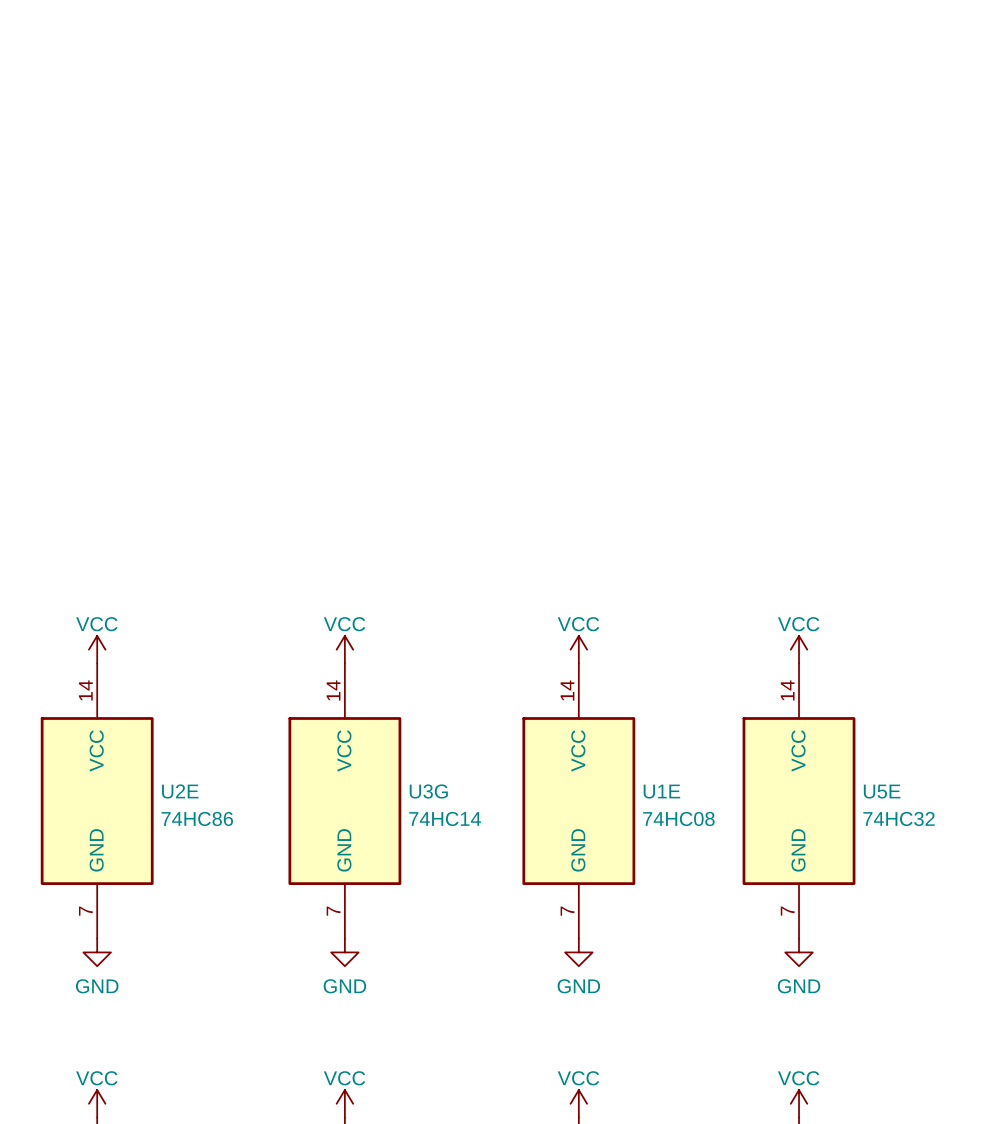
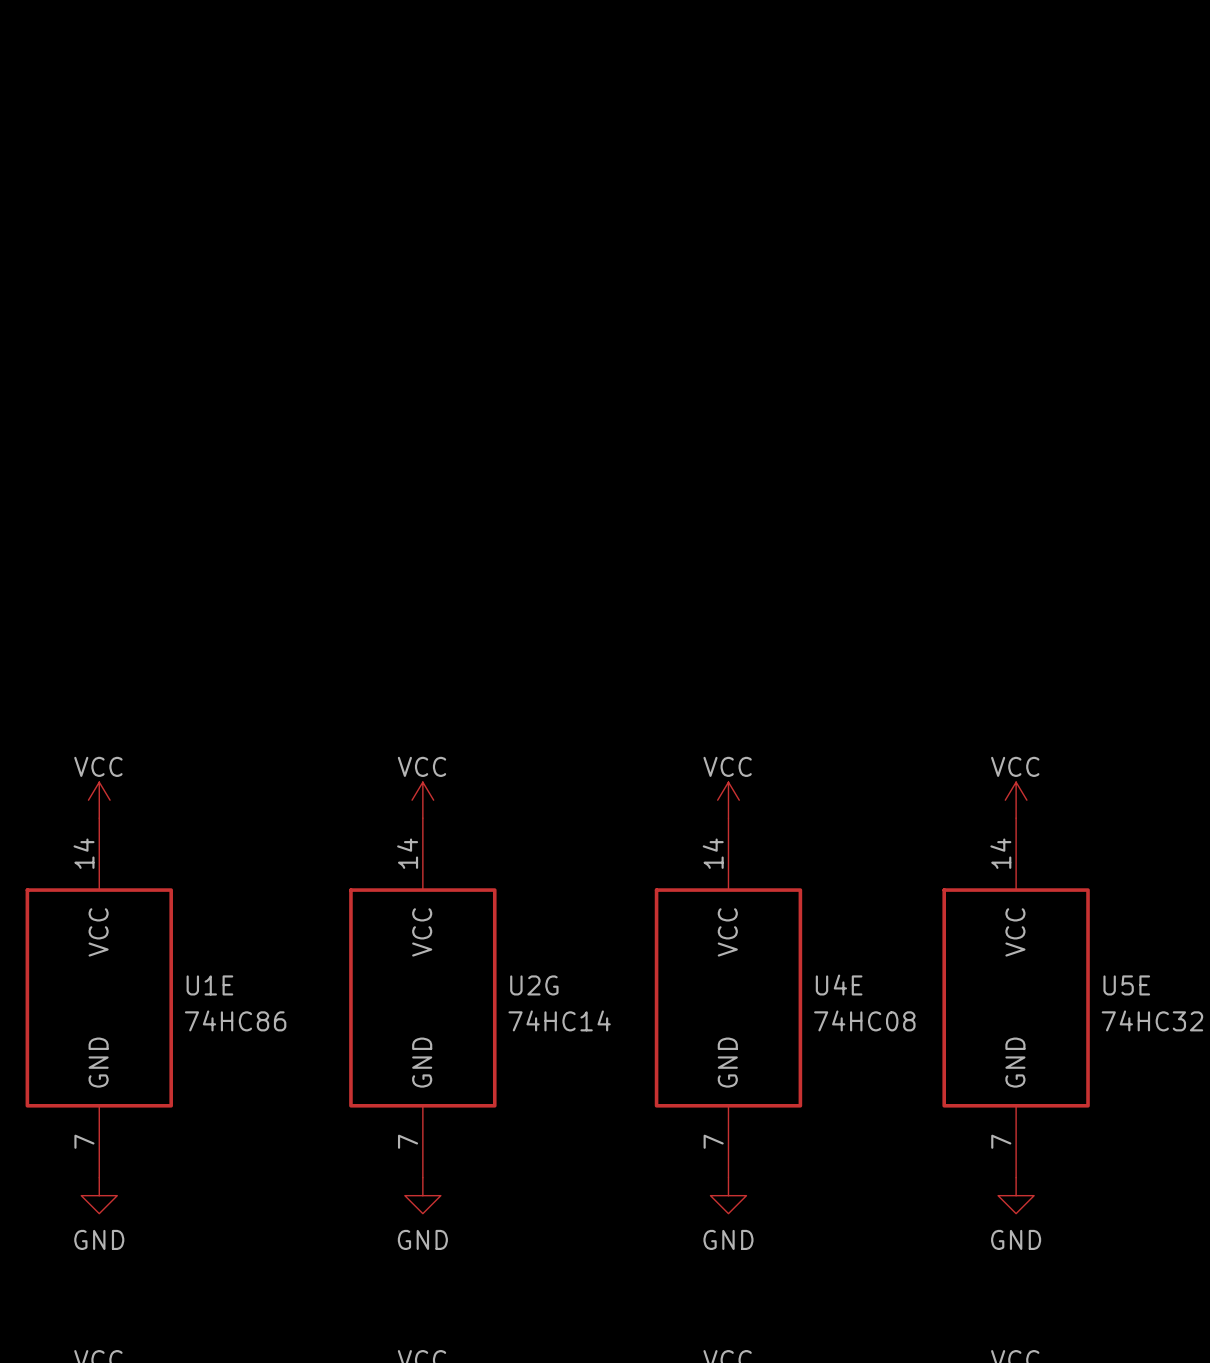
U2E name: U2E (180, 791) -> U1E (209, 985)
U3G name: U3G (428, 791) -> U2G (534, 985)
U1E name: U1E (661, 791) -> U4E (839, 985)

